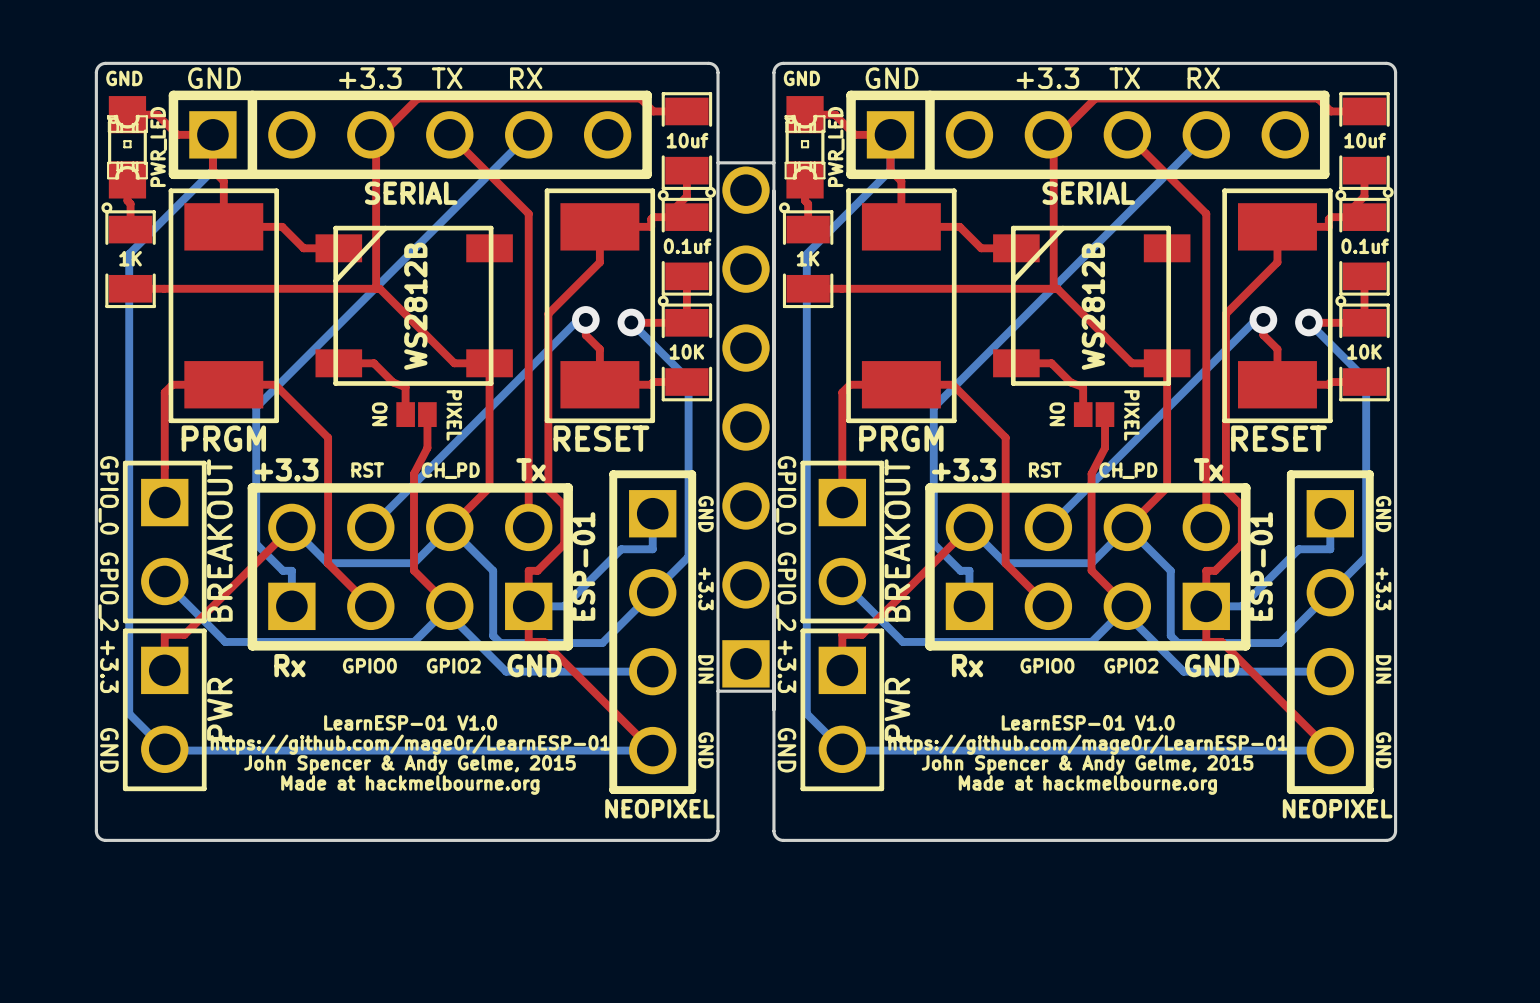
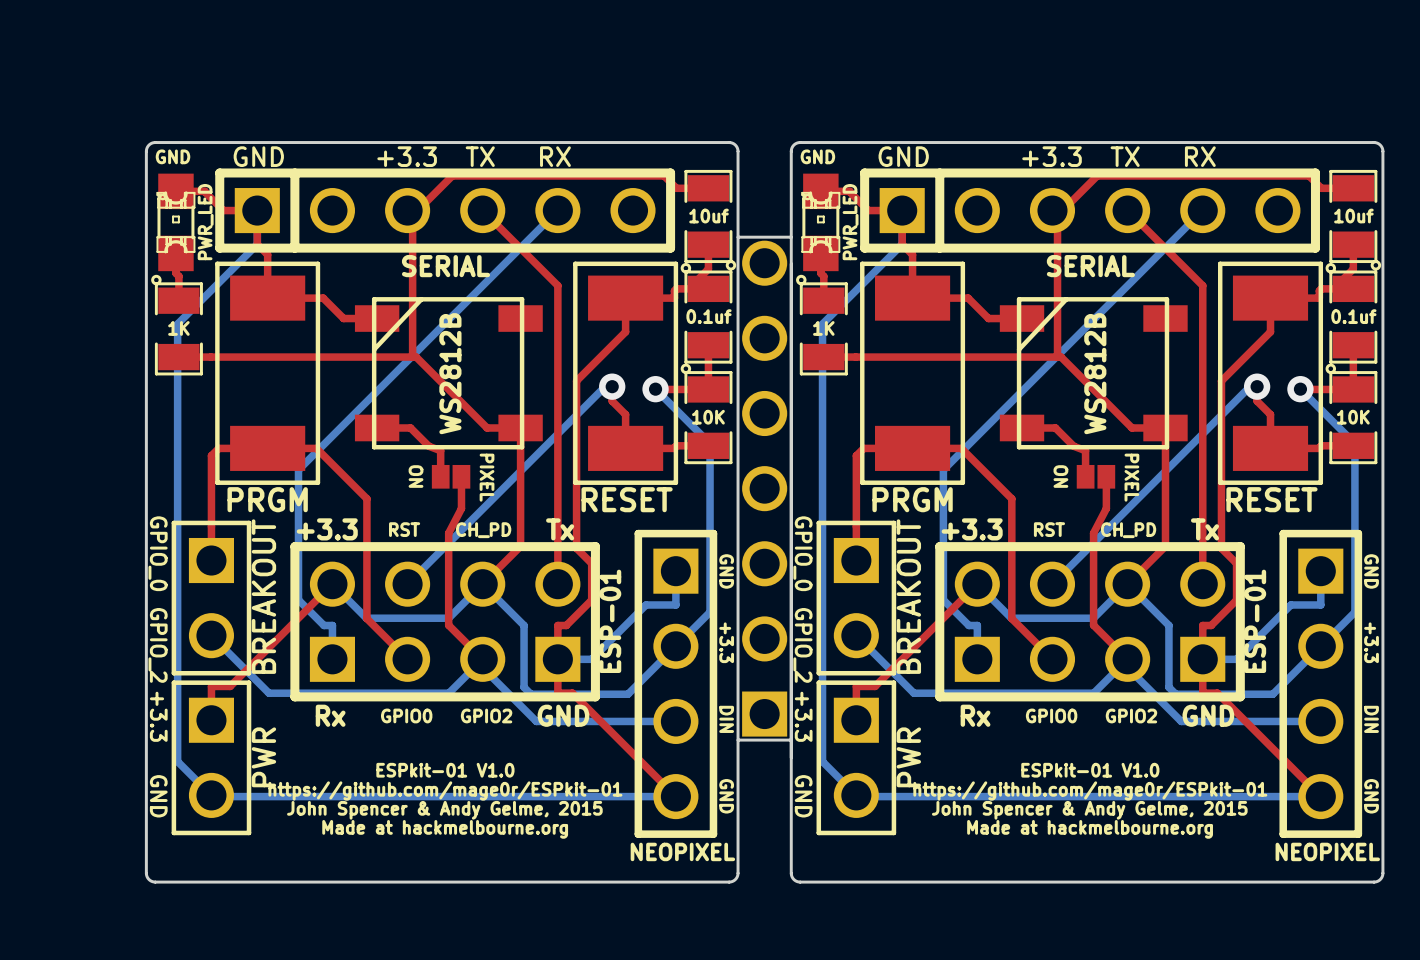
text: LearnESP-01 V1.0 (410, 722) -> ESPkit-01 V1.0 (445, 770)
text: LearnESP-01 V1.0 (1088, 722) -> ESPkit-01 V1.0 (1090, 770)
text: https://github.com/mage0r/LearnESP-01 (410, 744) -> https://github.com/mage0r/ESPkit-01 (445, 790)
text: https://github.com/mage0r/LearnESP-01 (1088, 744) -> https://github.com/mage0r/ESPkit-01 (1090, 790)

